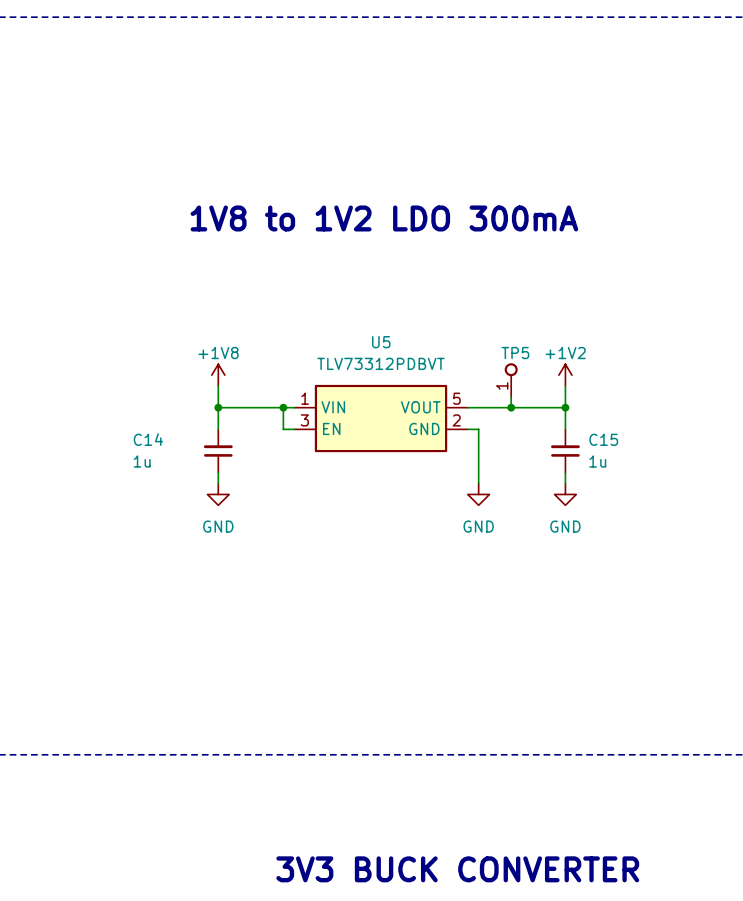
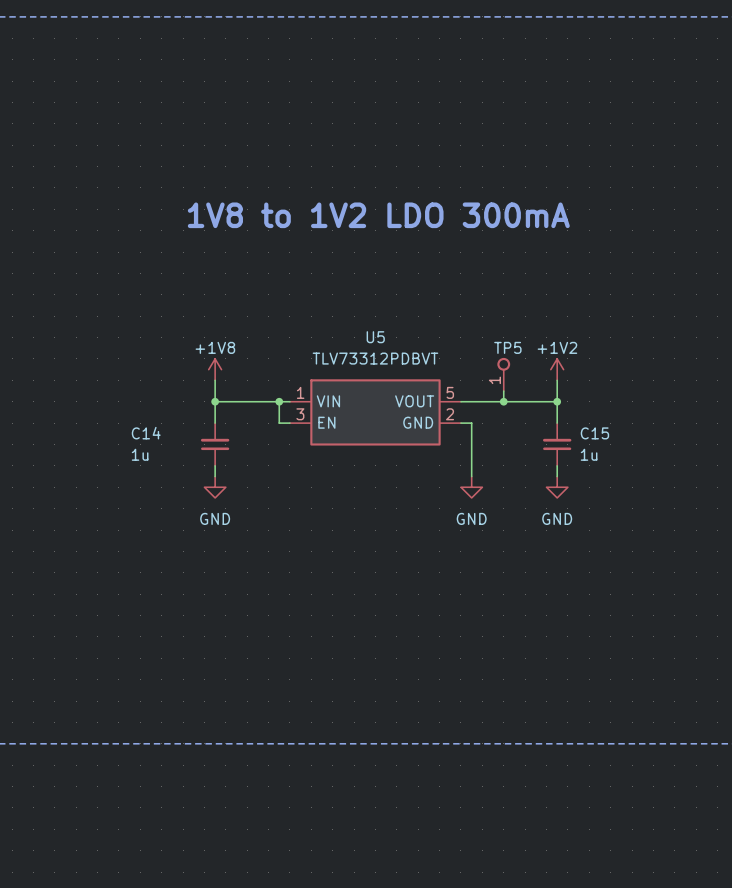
text: 3V3 BUCK CONVERTER (457, 869) -> none

